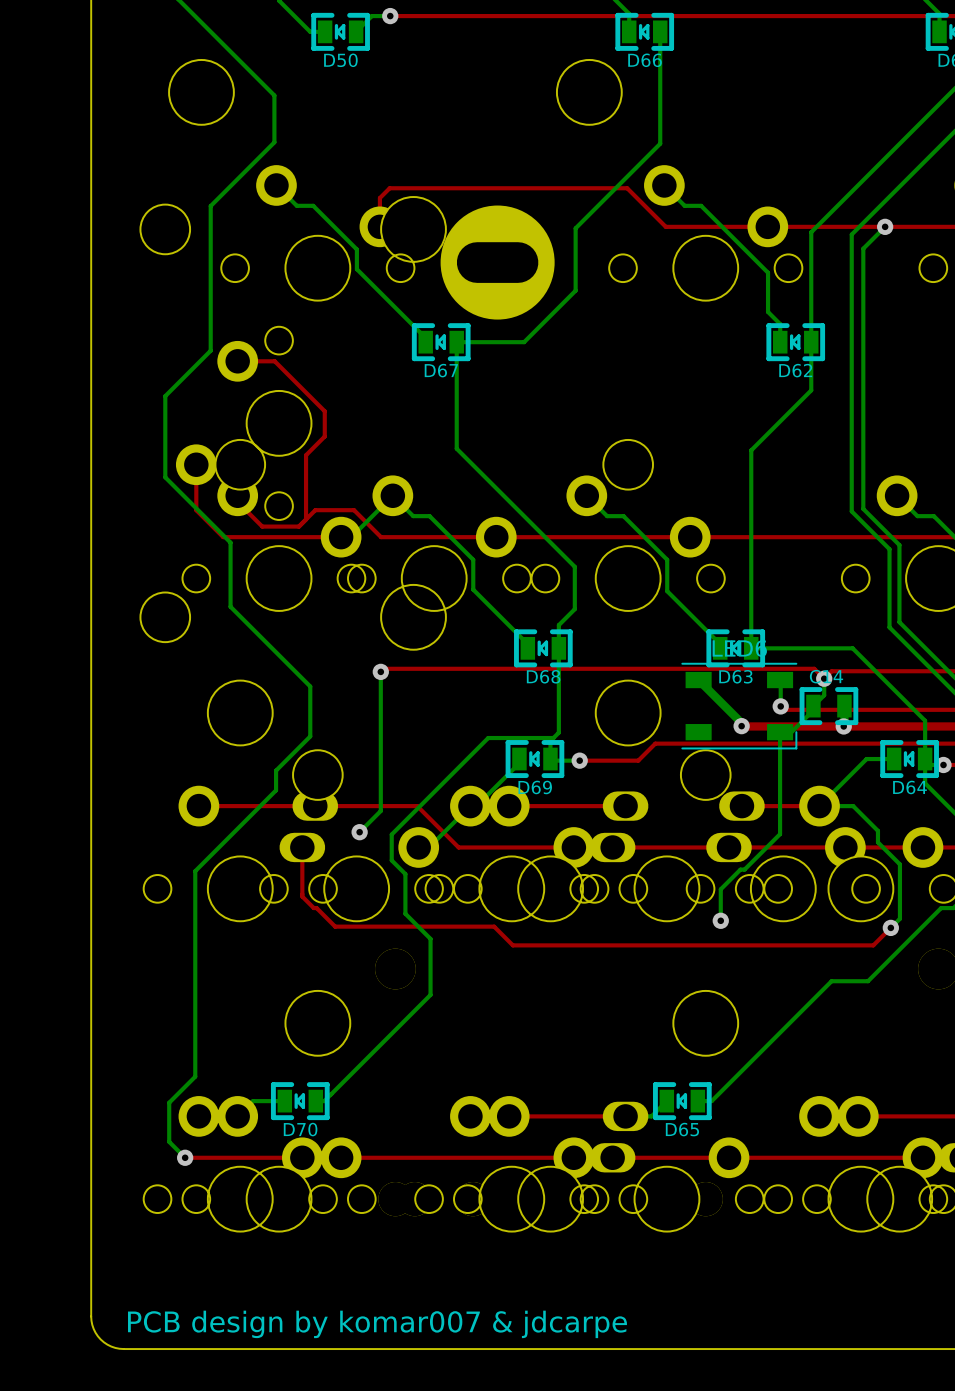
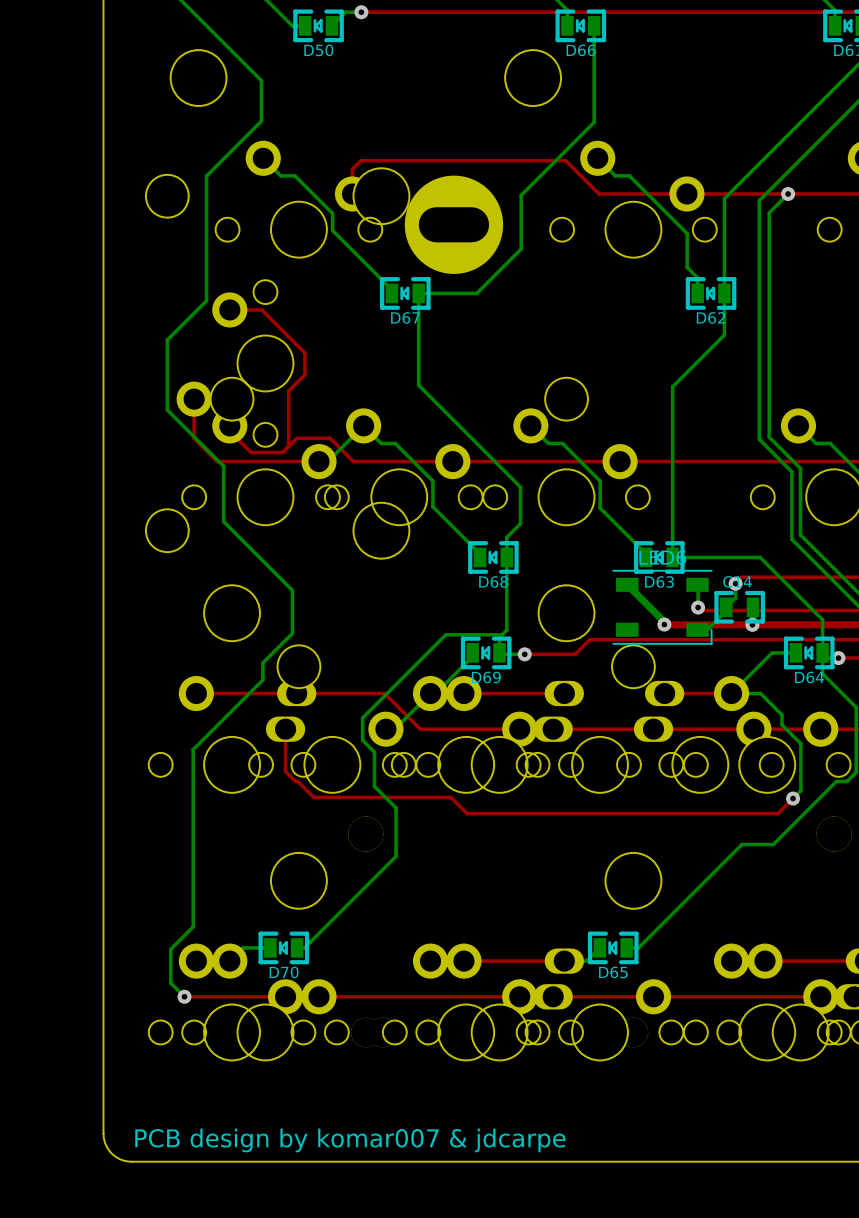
bottom track: (380, 671) (380, 811) (359, 832) -> none
top track: (380, 671) (384, 668) (814, 668) (824, 678) -> none
via: (380, 671) -> none
bottom track: (780, 732) (780, 834) (744, 869) (740, 869) (720, 889) (720, 920) -> none
via: (359, 832) -> none
via: (720, 920) -> none

